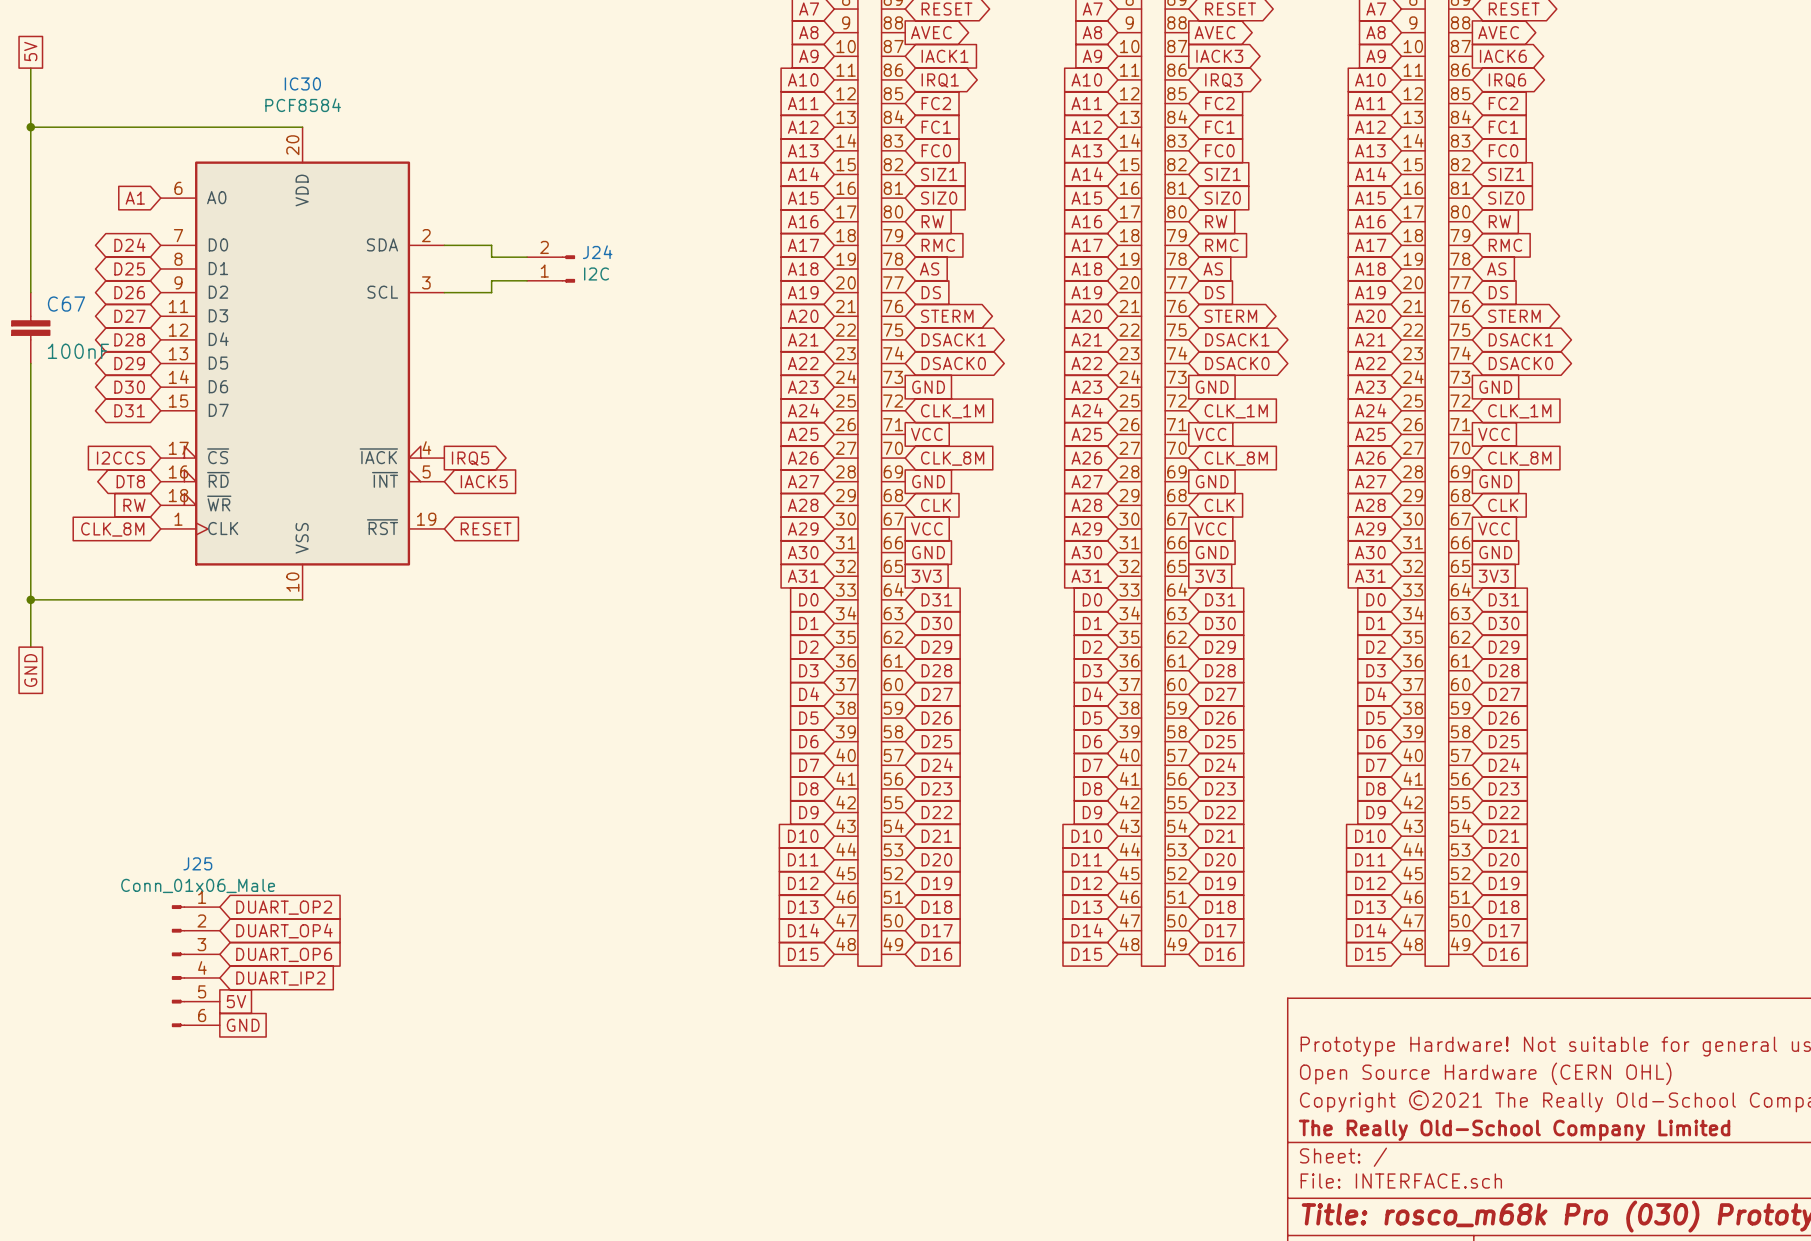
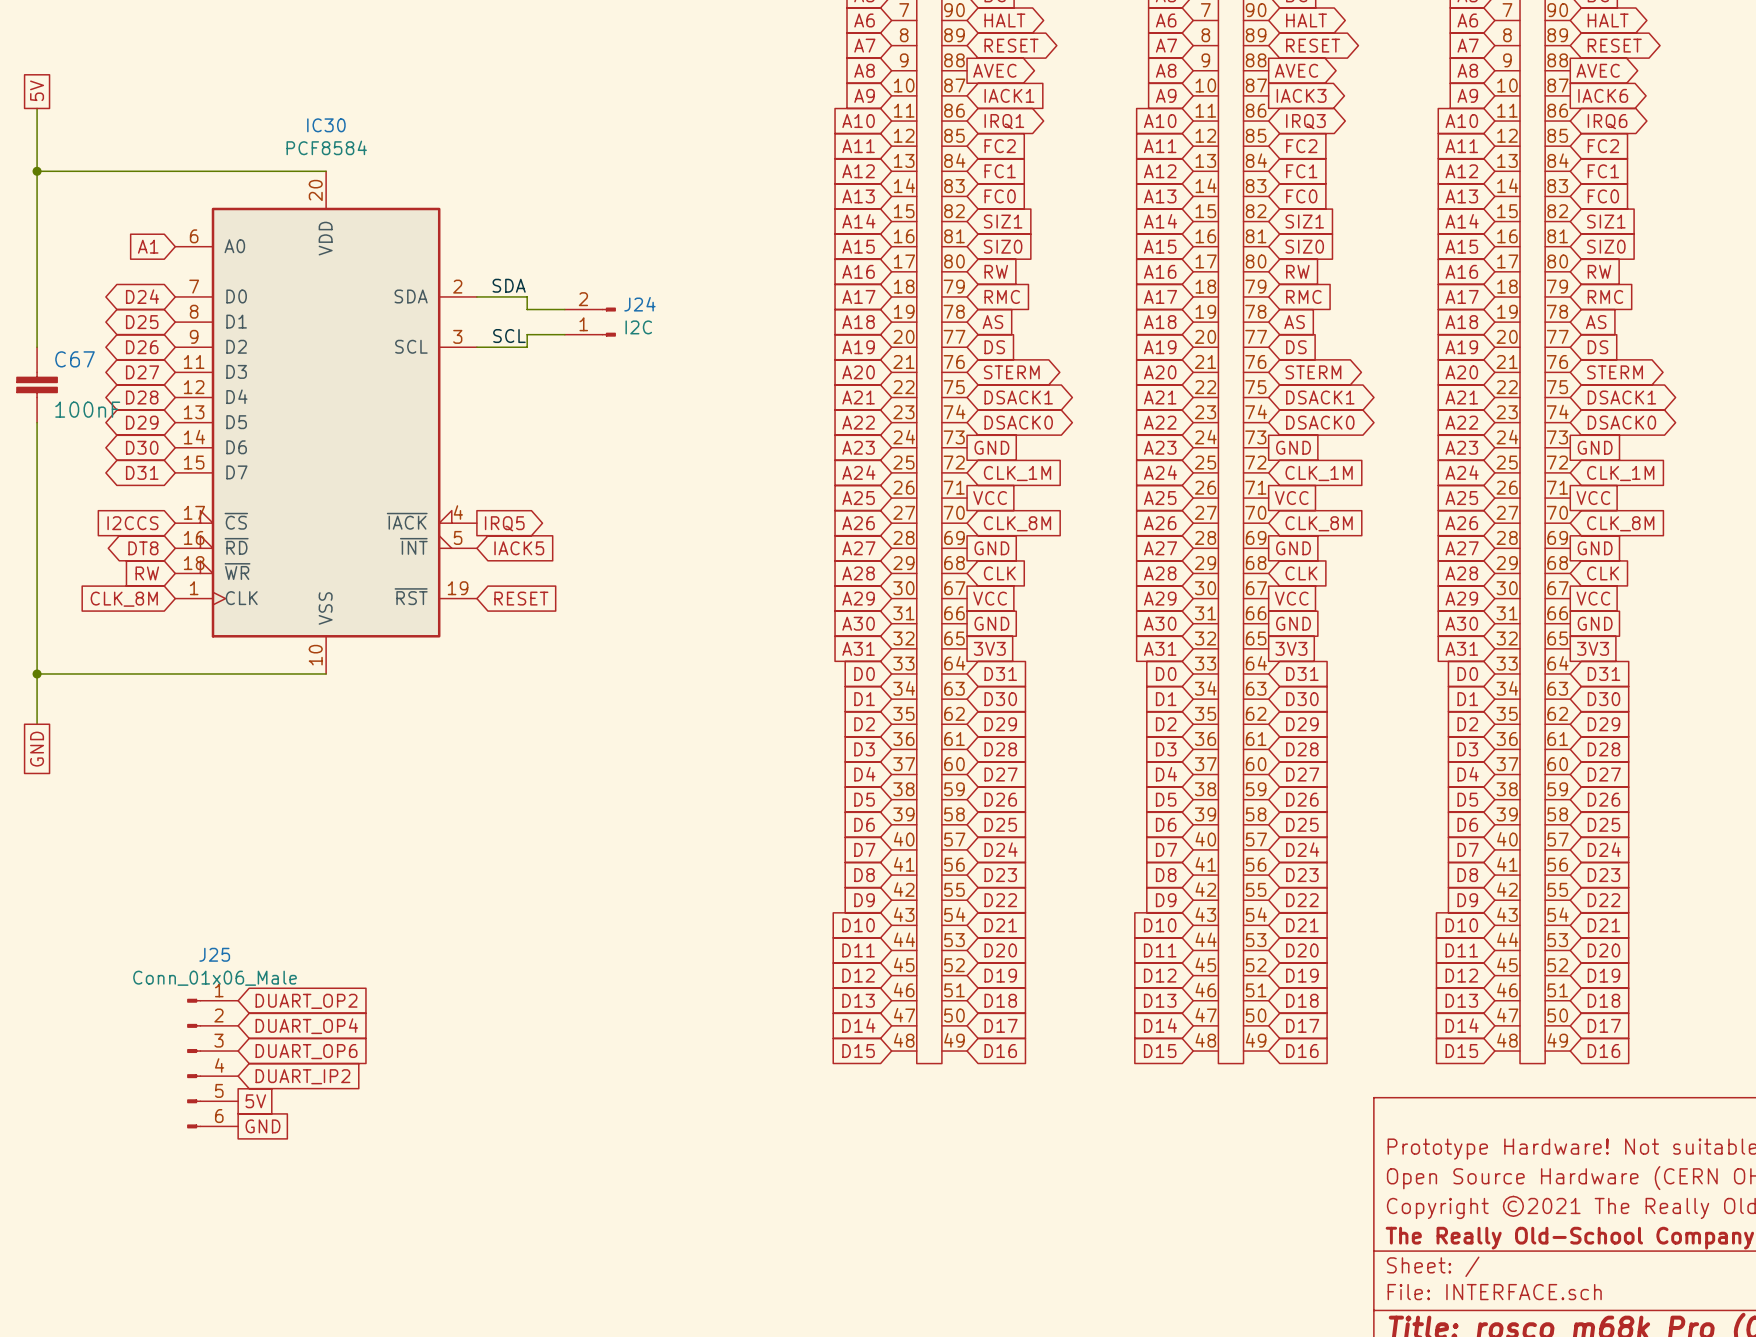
label: none -> SDA (509, 285)
label: none -> SCL (509, 336)

